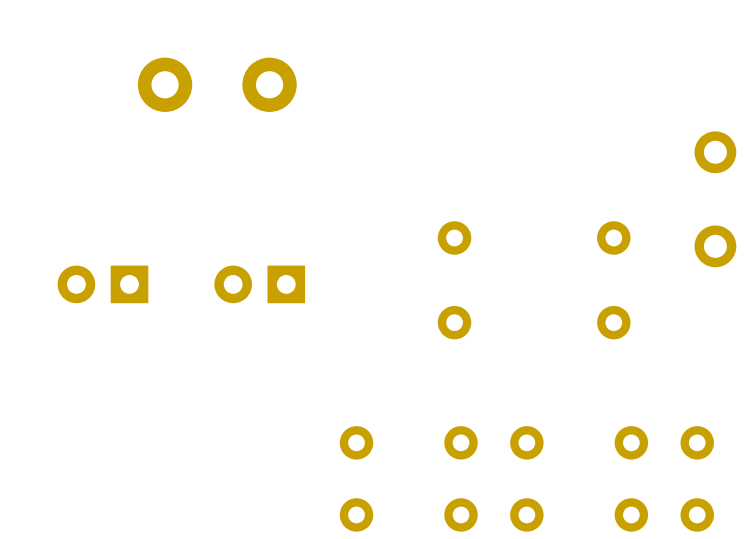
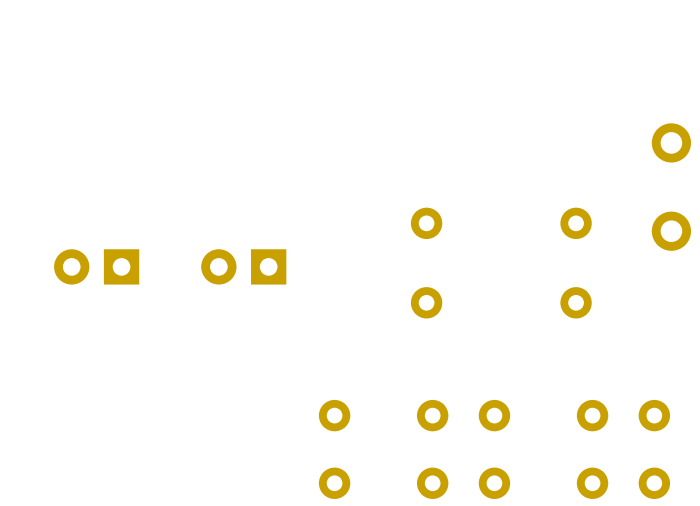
part: (217, 84) -> none

